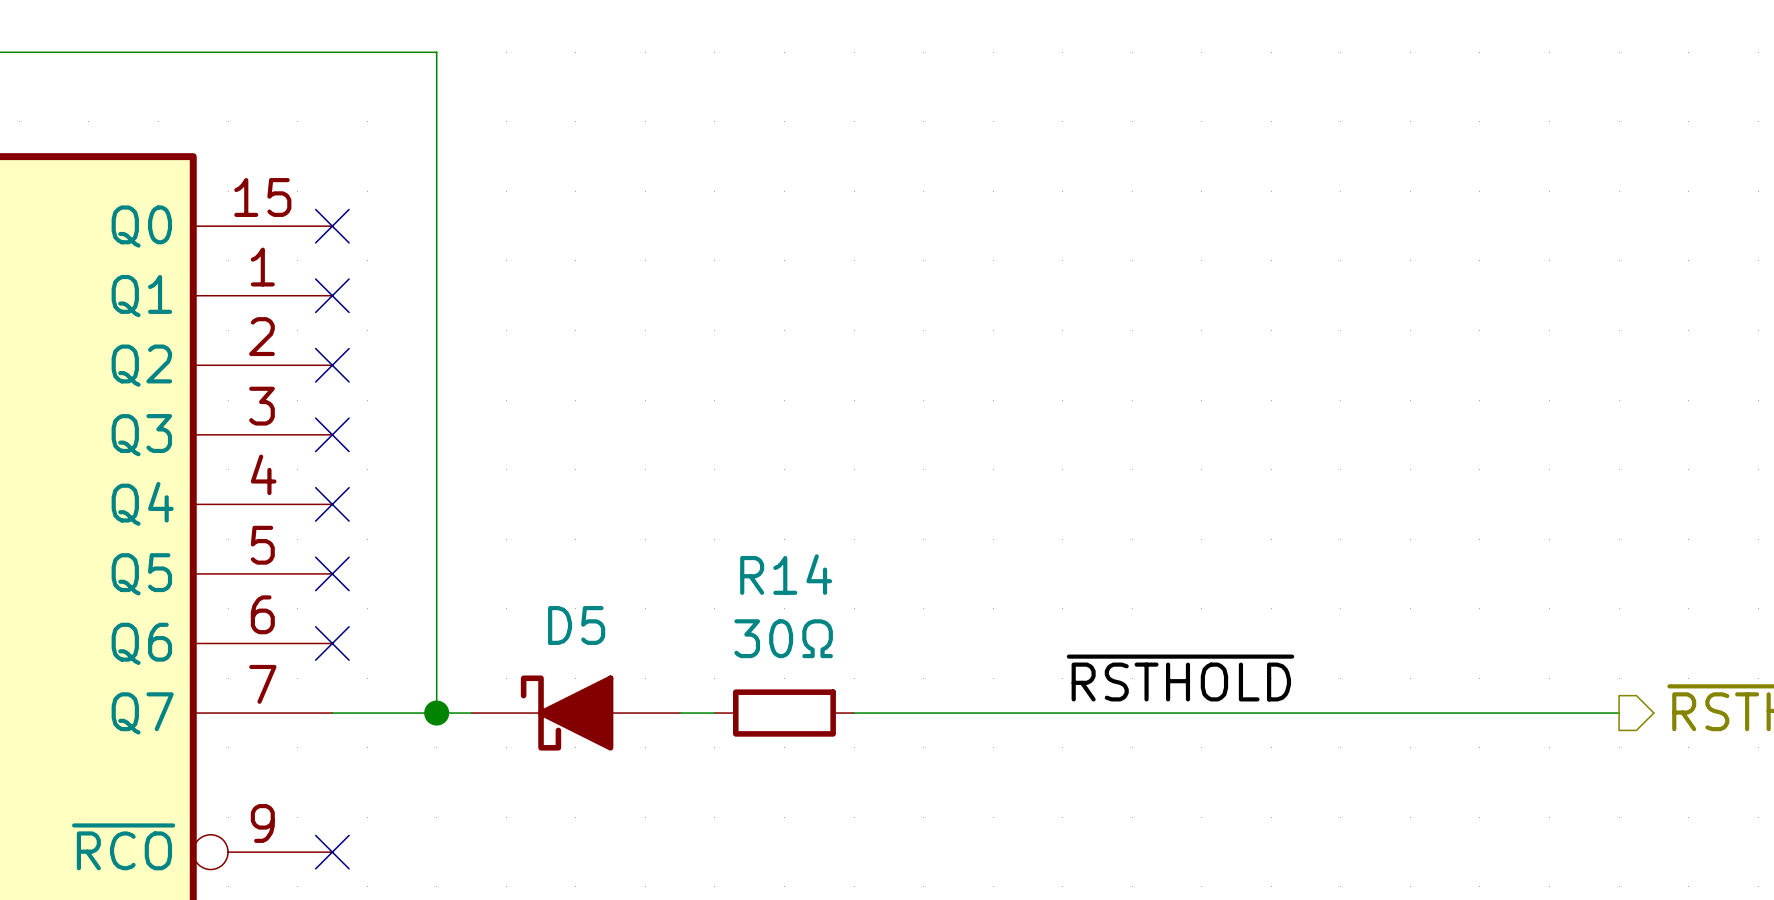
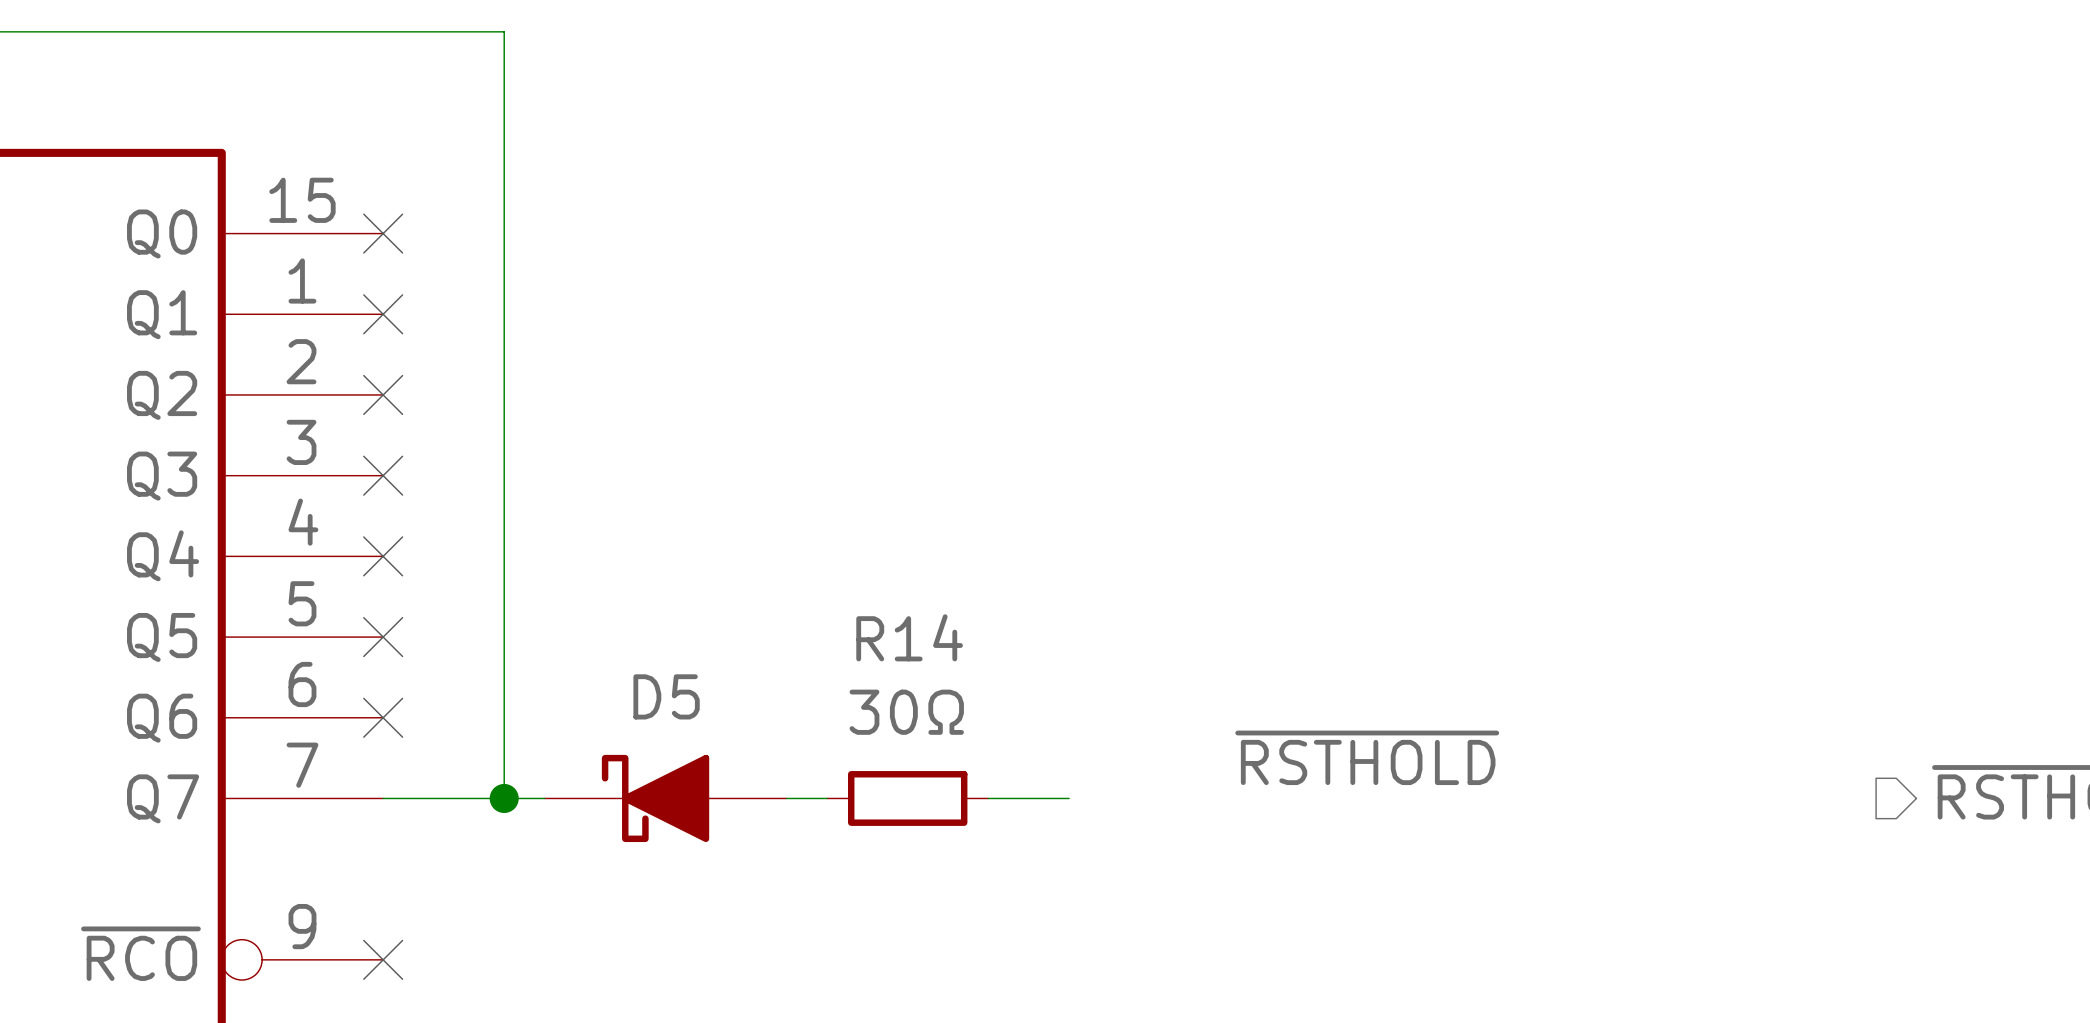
wire: (923, 713) (1619, 713) -> none

